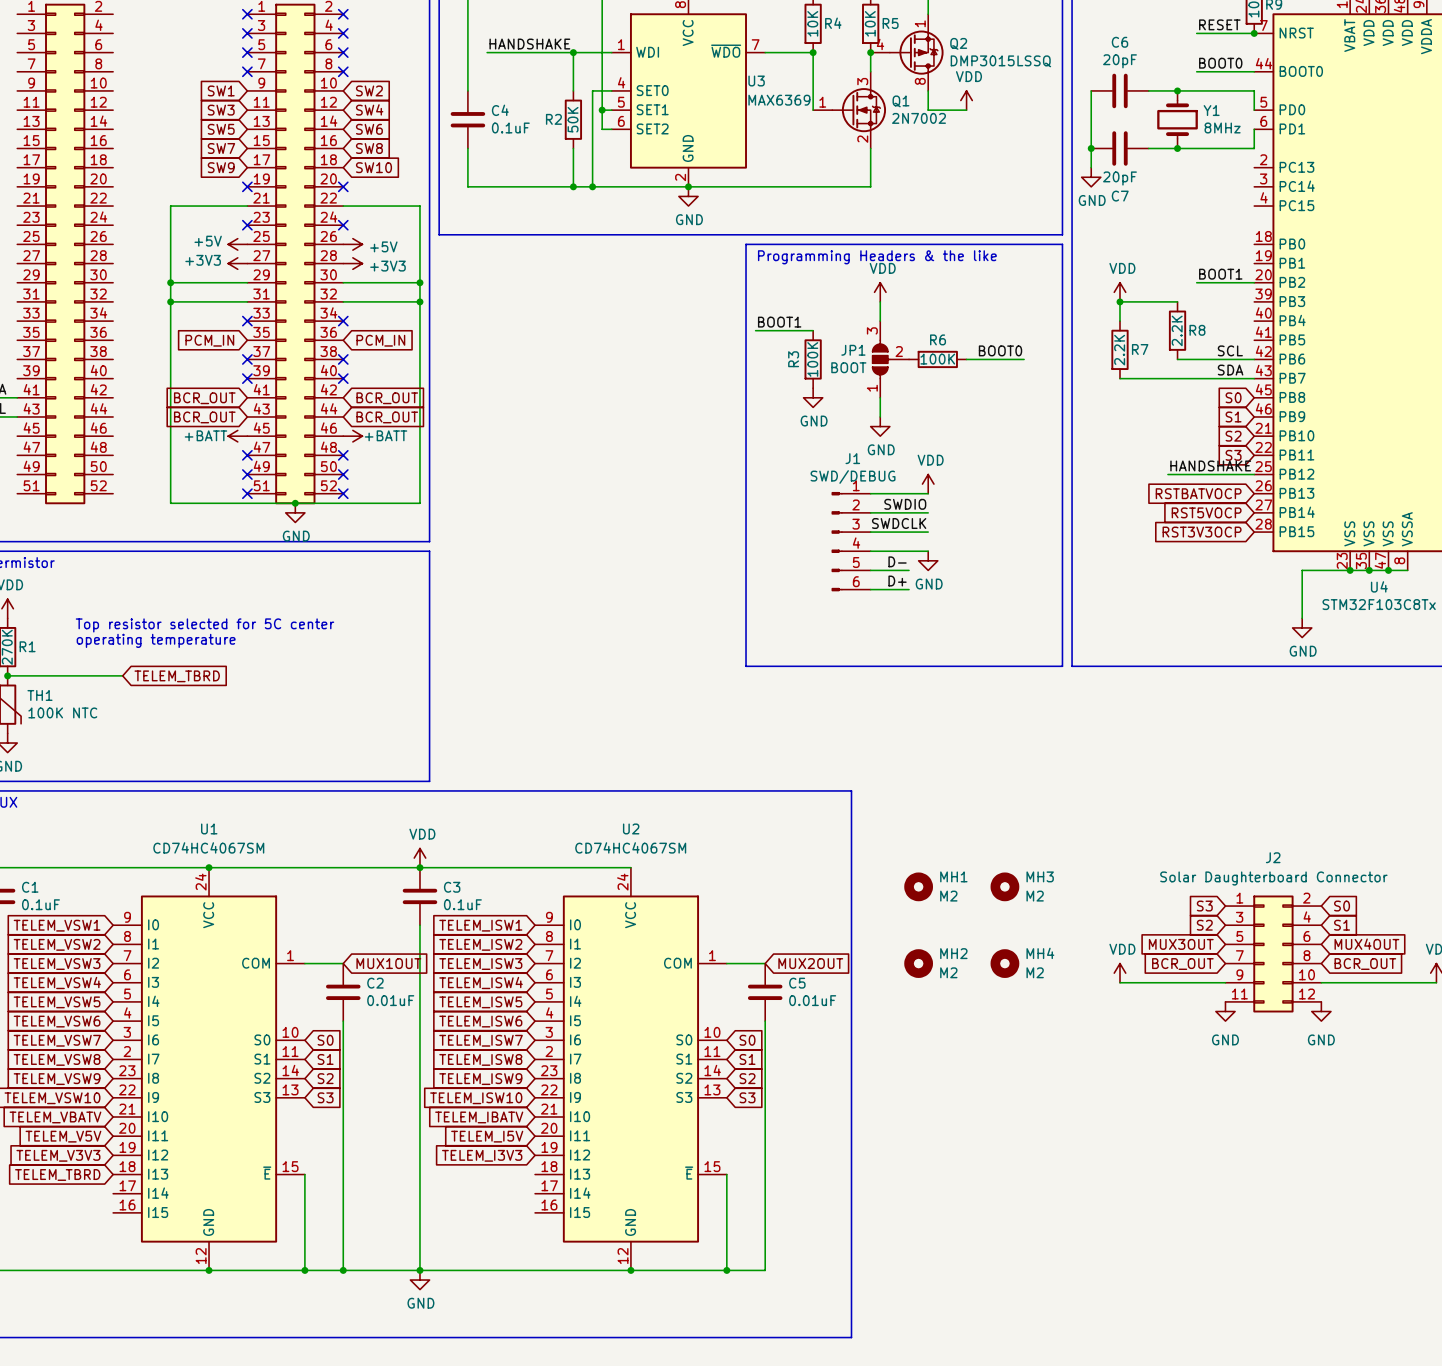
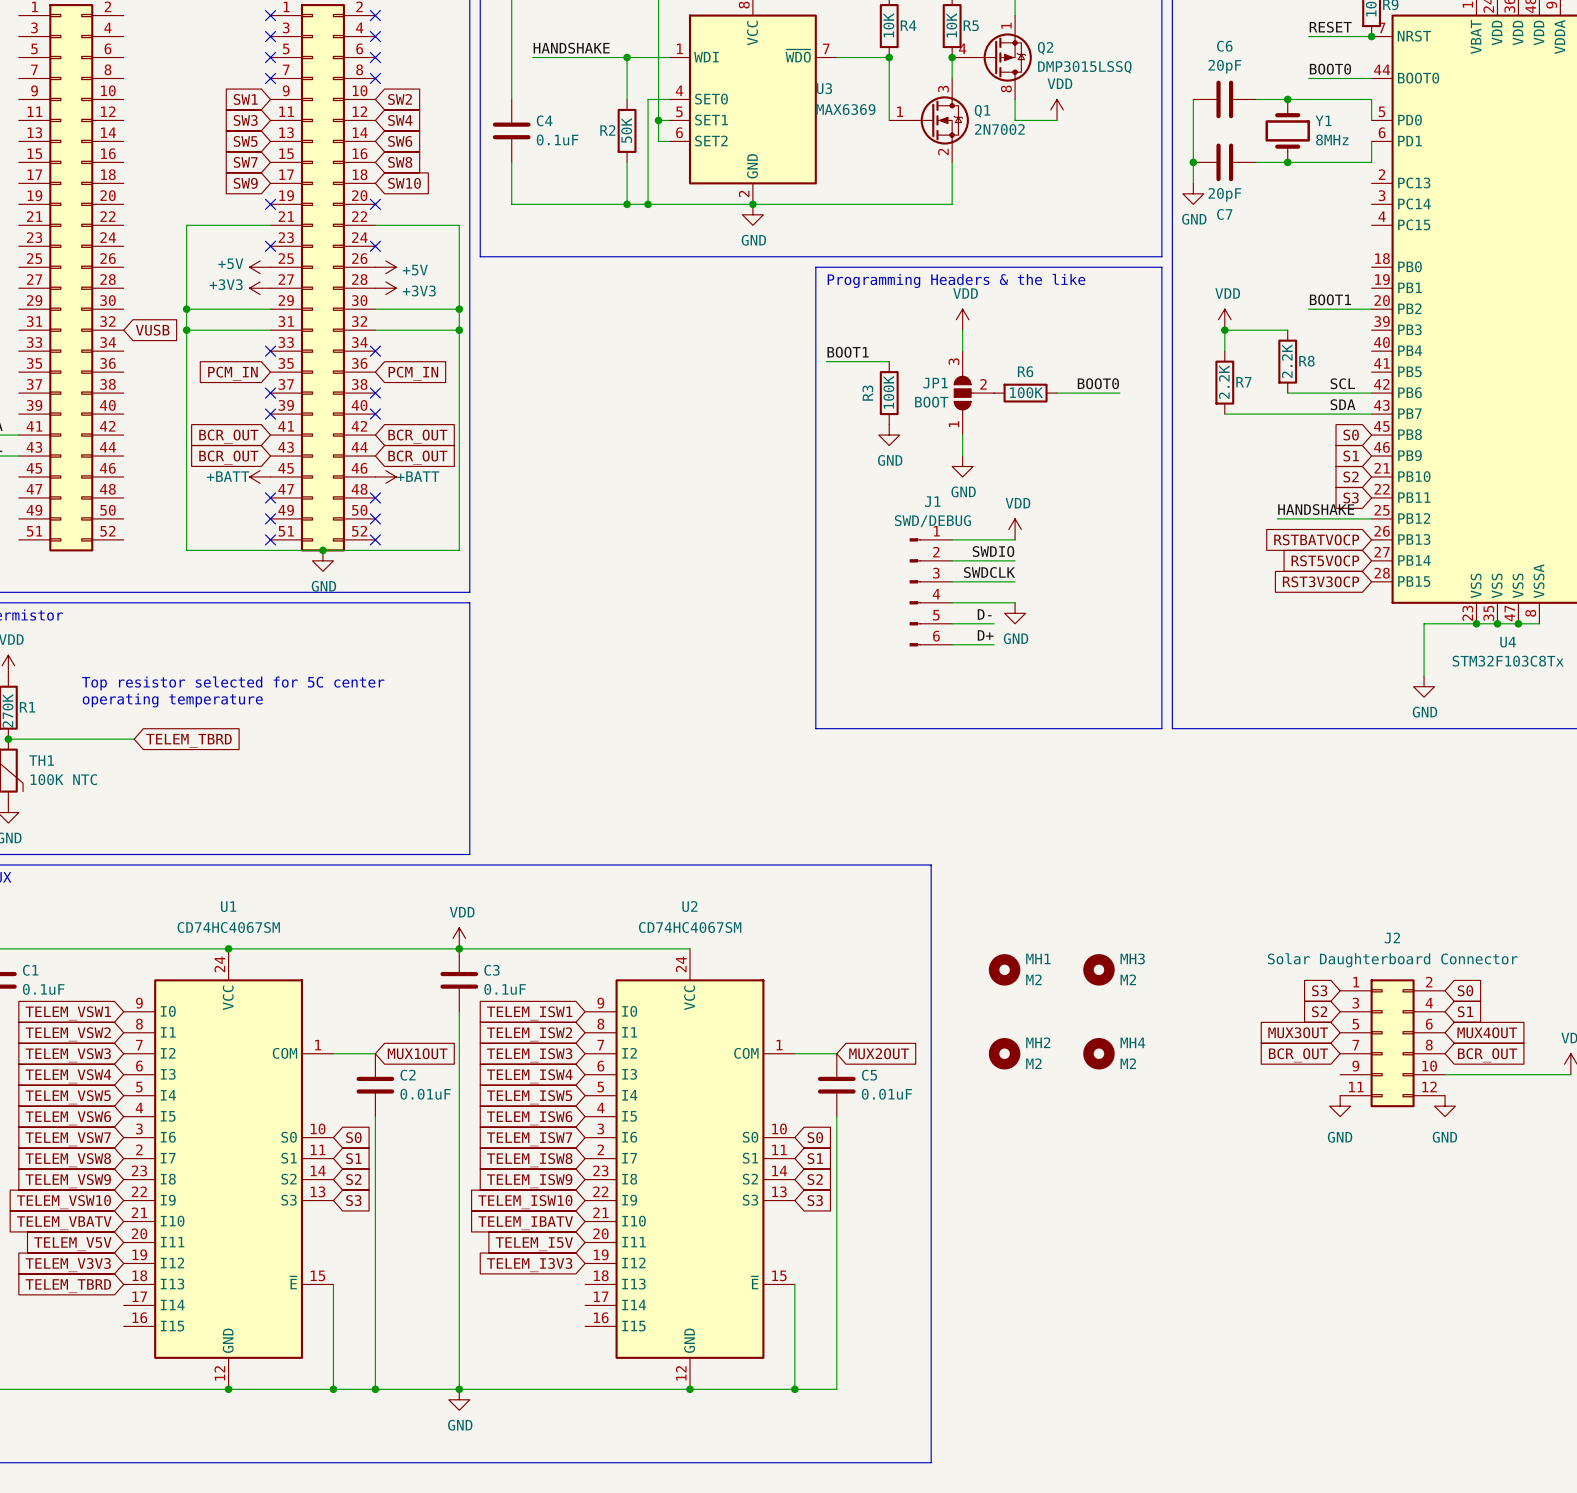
global label: none -> VUSB (152, 330)
power symbol: VDD (1119, 973) -> none
wire: (1119, 982) (1225, 982) -> none

